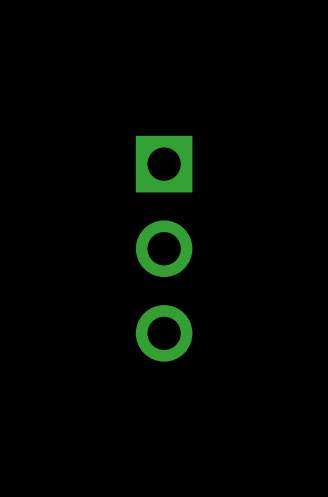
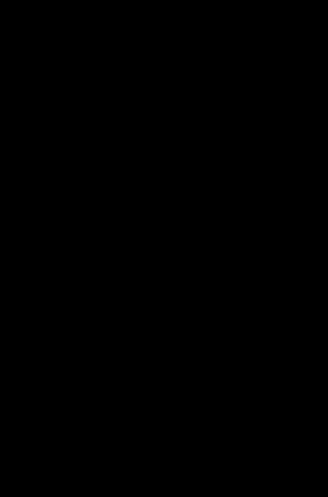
part: (164, 248) -> none

